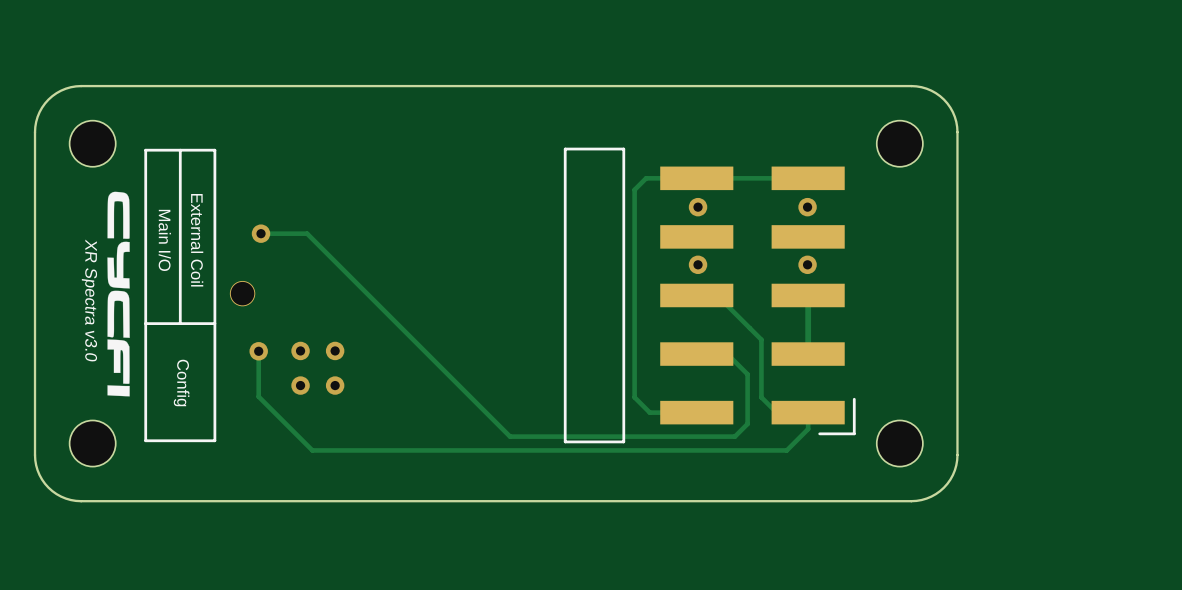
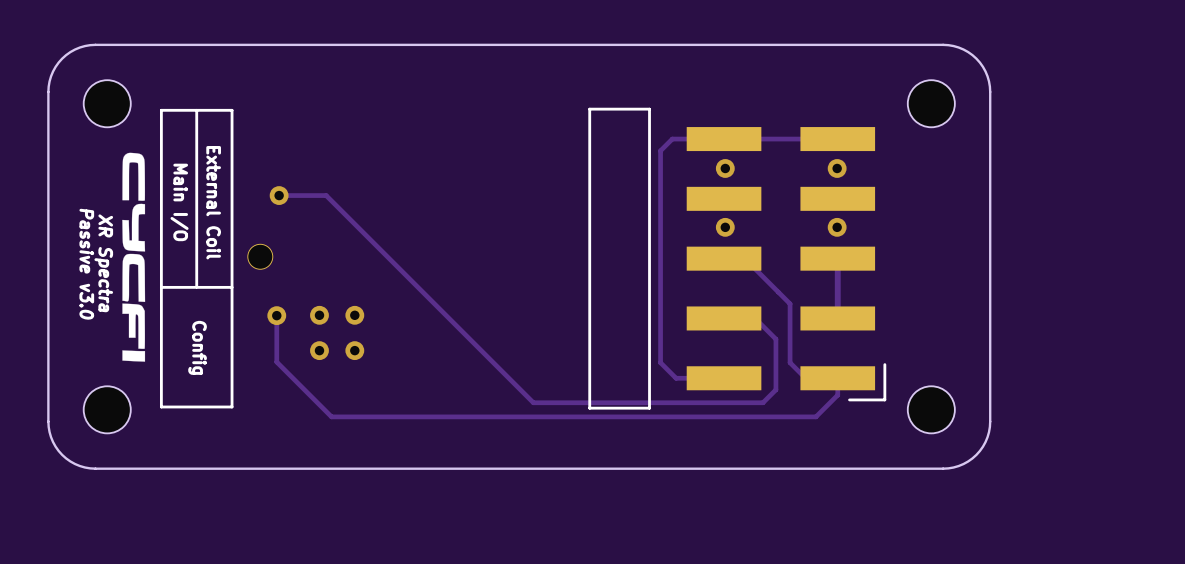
text: XR Spectra v3.0 (89, 300) -> XR Spectra (103, 263)
text: none -> Passive v3.0 (86, 264)

